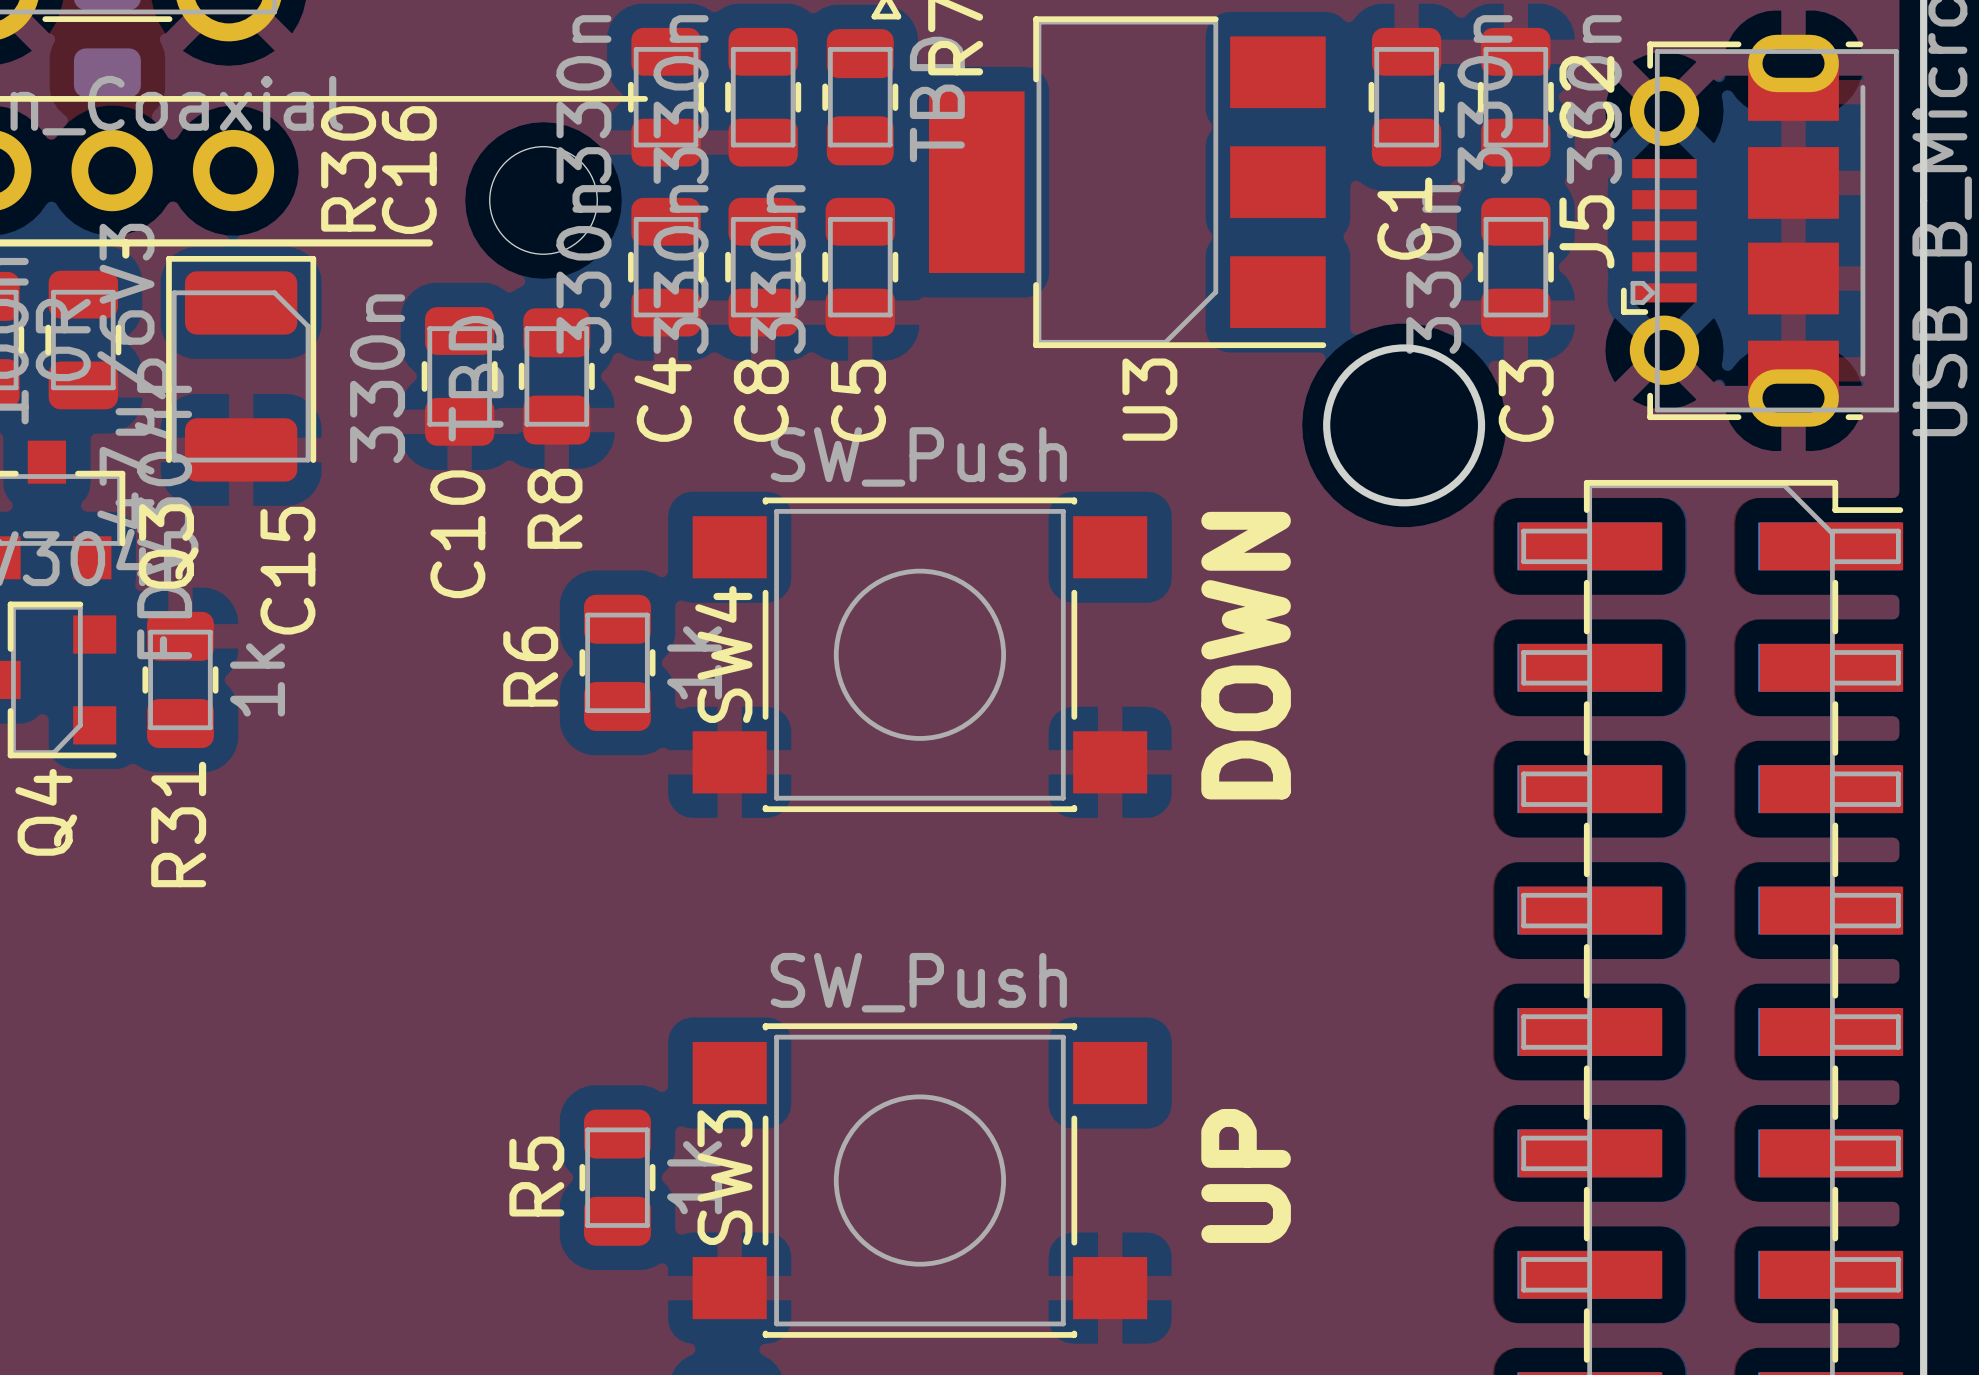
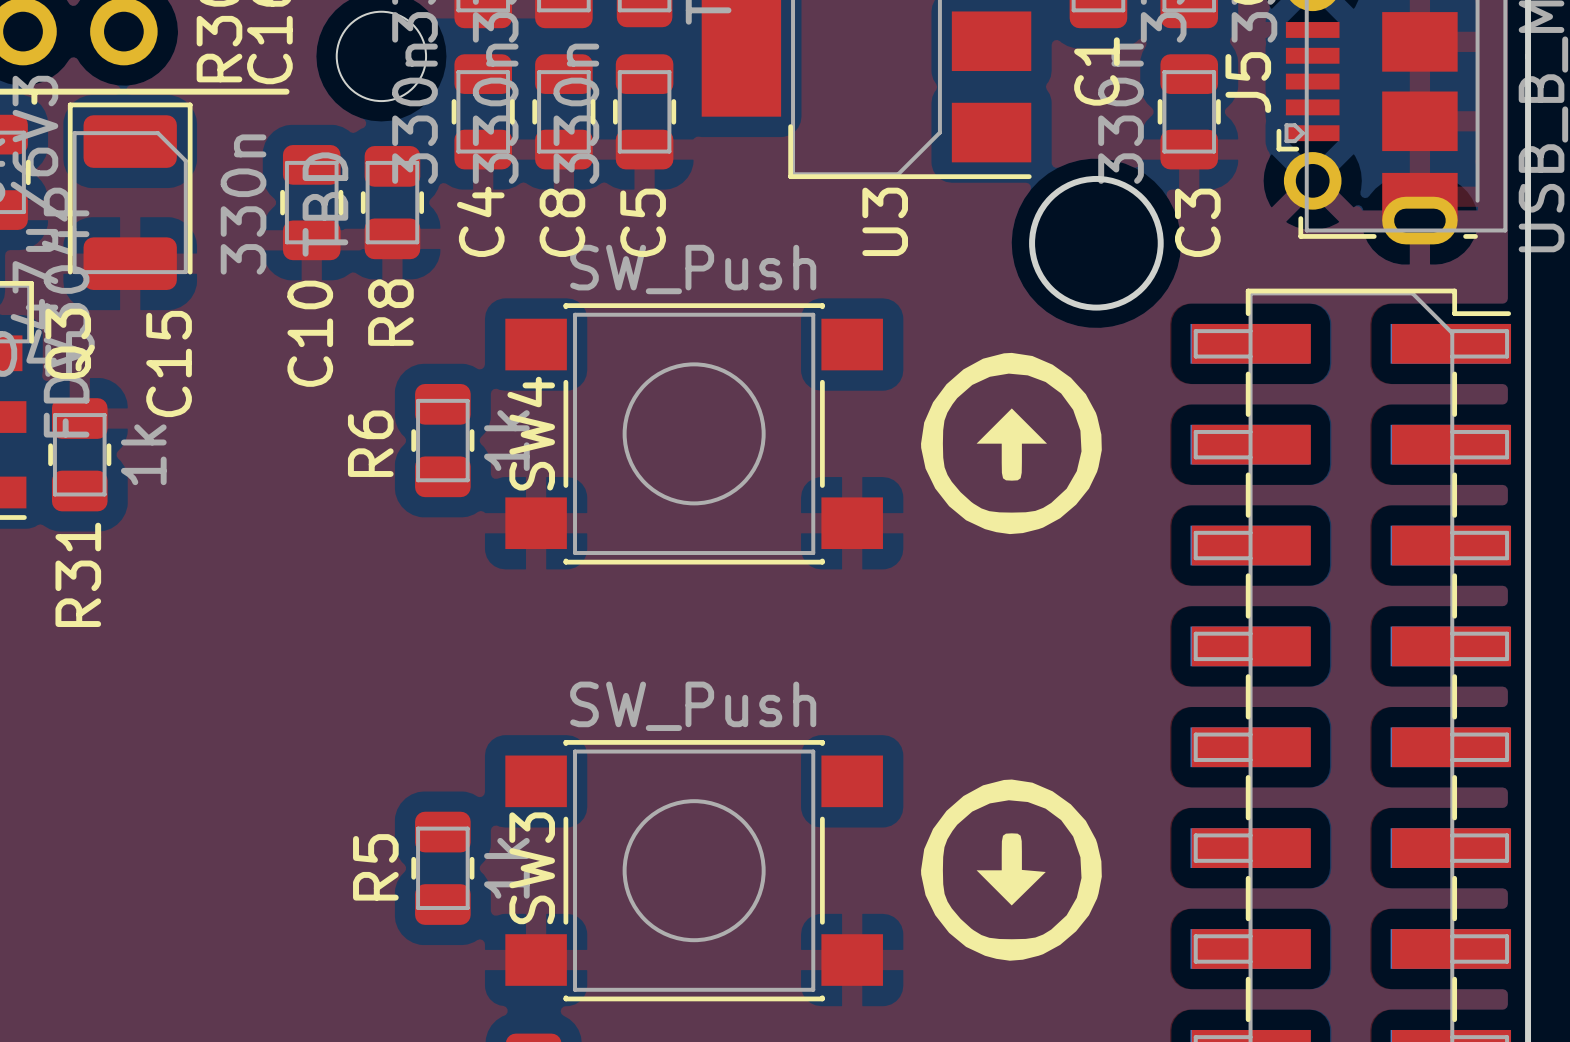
drawing: none -> [921, 352, 1102, 535]
text: DOWN (1246, 655) -> none
drawing: none -> [921, 779, 1102, 961]
text: UP (1246, 1175) -> none

